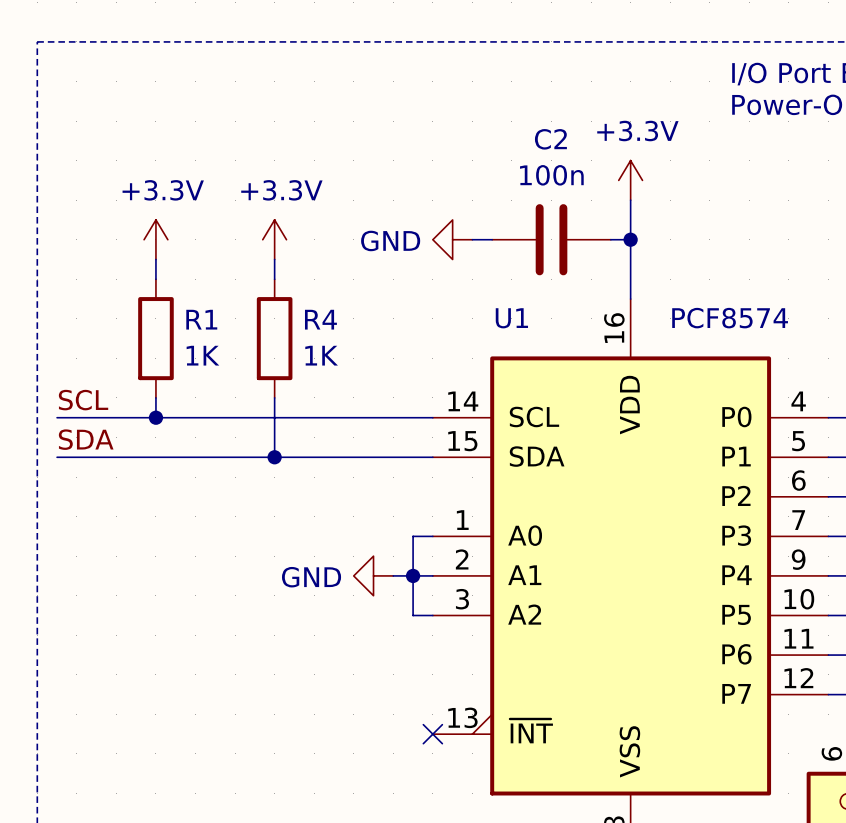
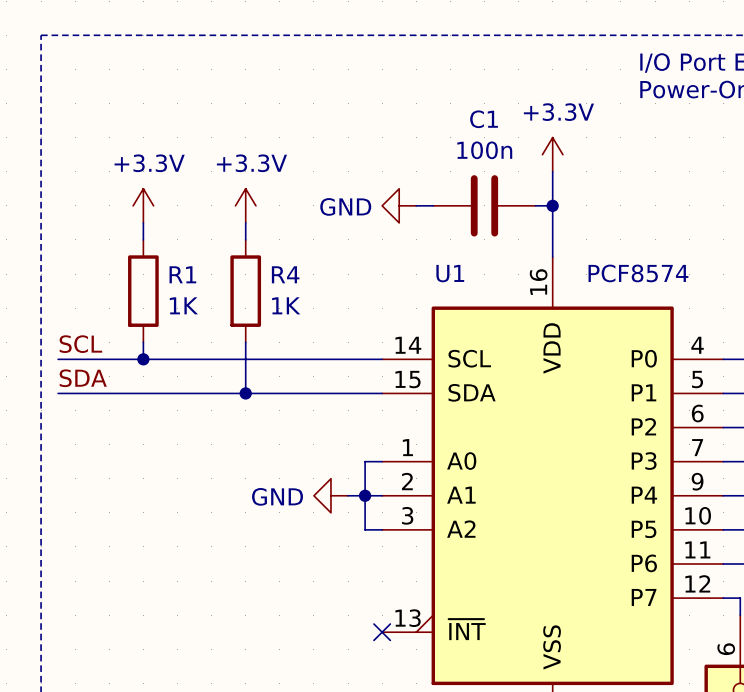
C2 name: C2 (550, 139) -> C1 (484, 119)

